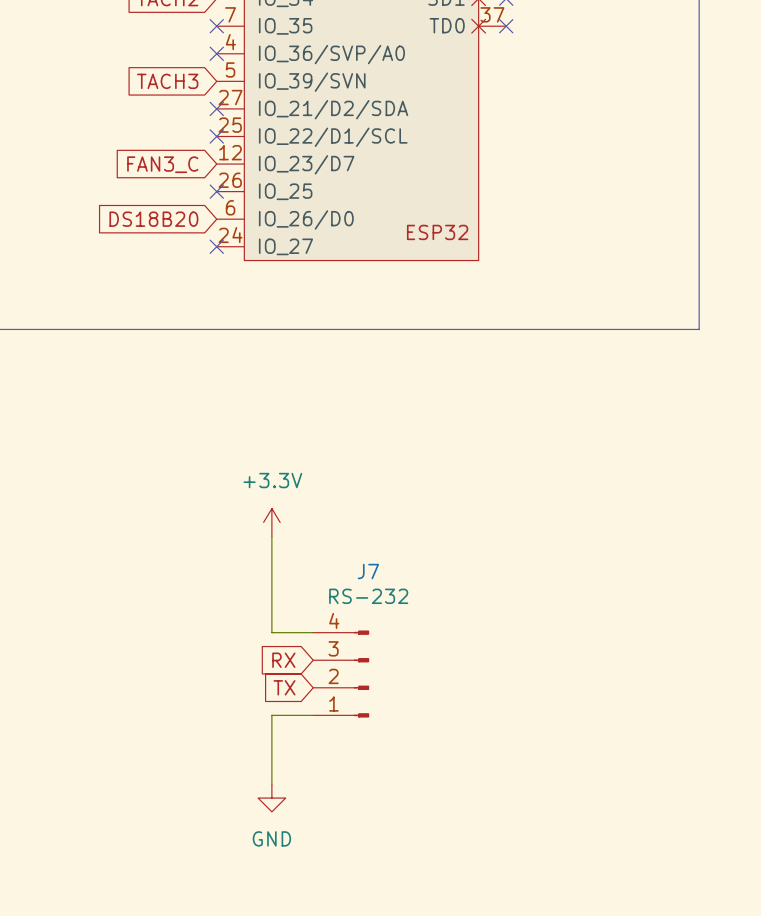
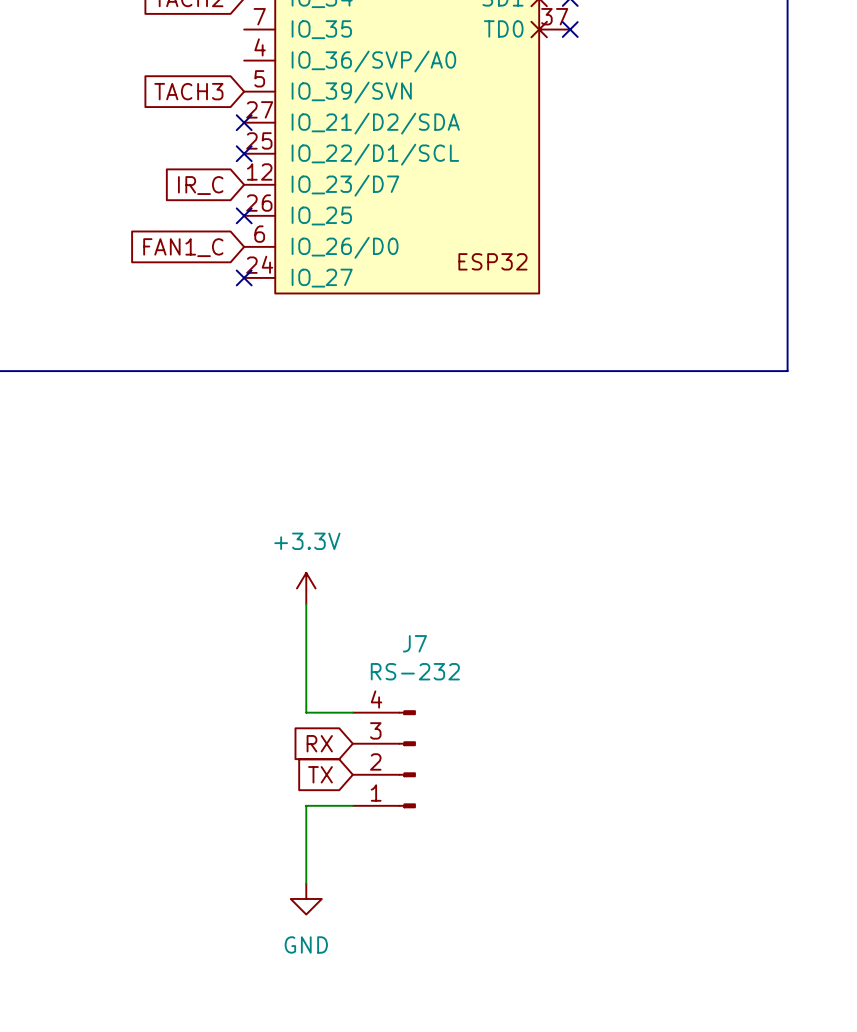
no-connect mark: (216, 26) -> none
no-connect mark: (216, 53) -> none
global label: FAN3_C (162, 164) -> IR_C (200, 185)
global label: DS18B20 (153, 219) -> FAN1_C (183, 247)

